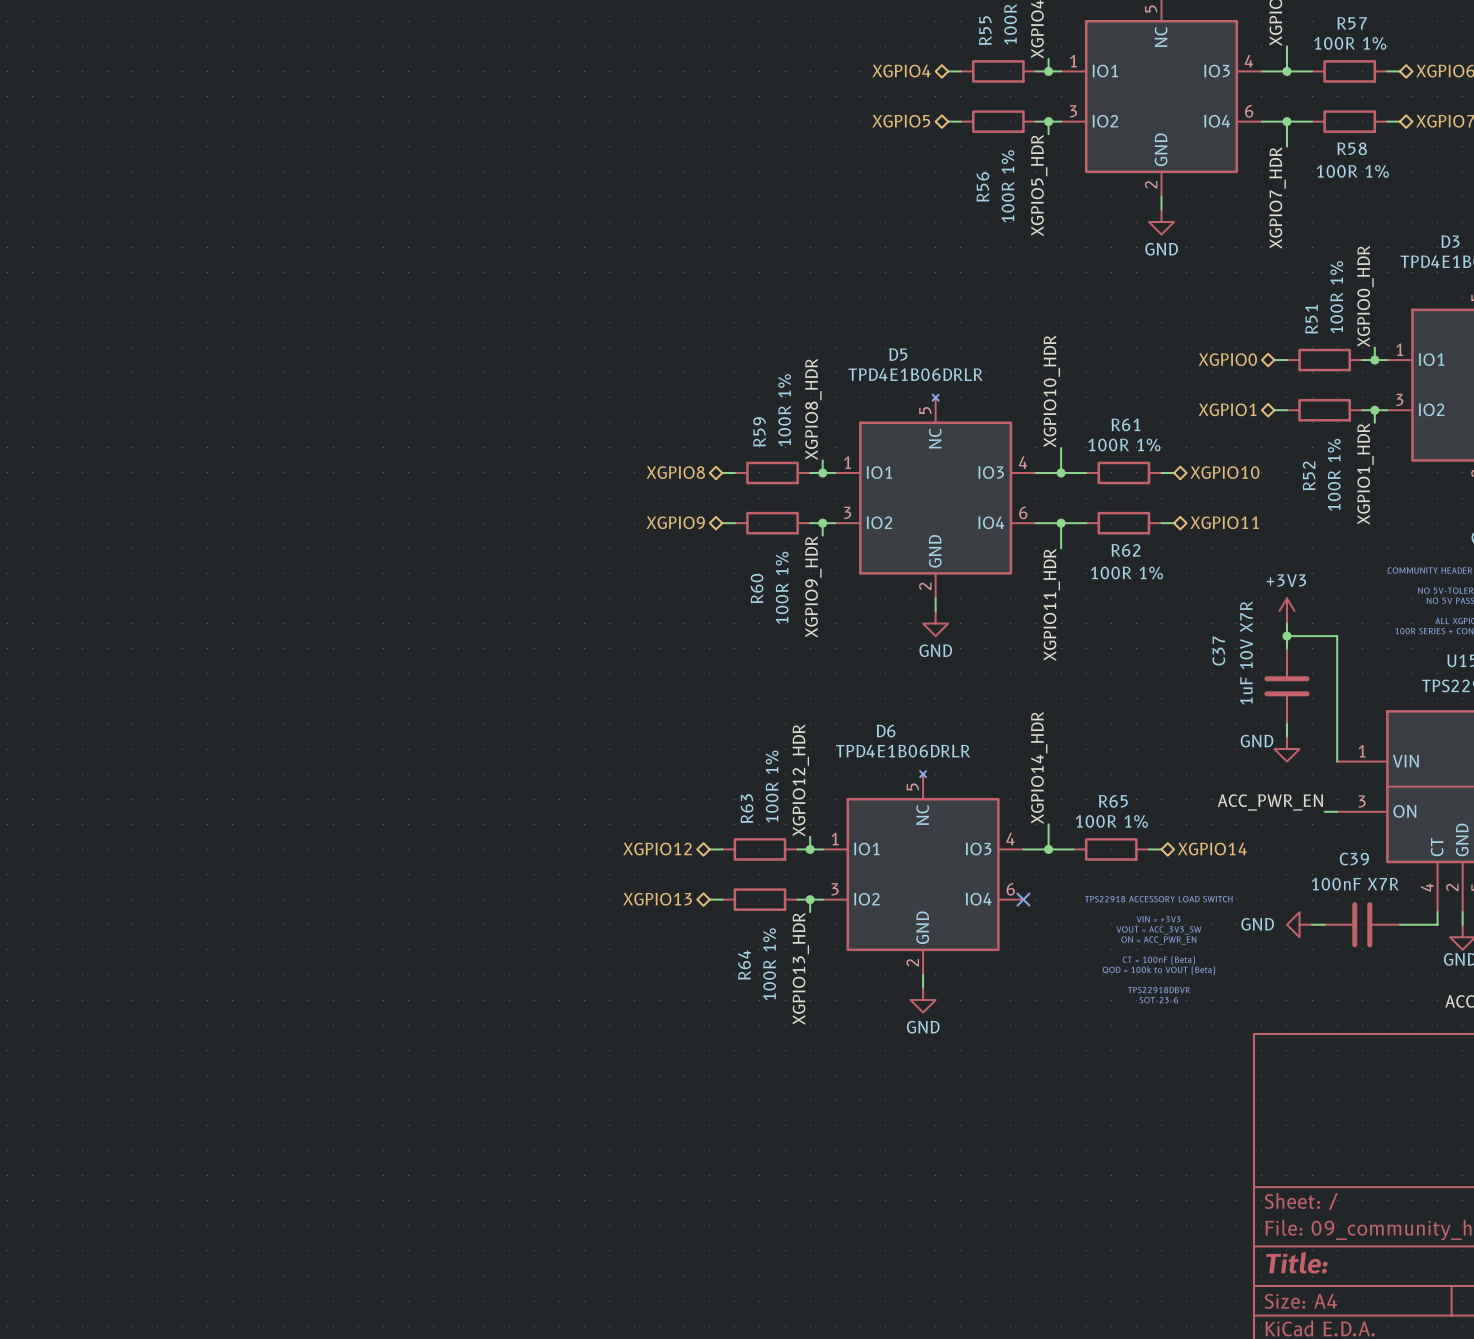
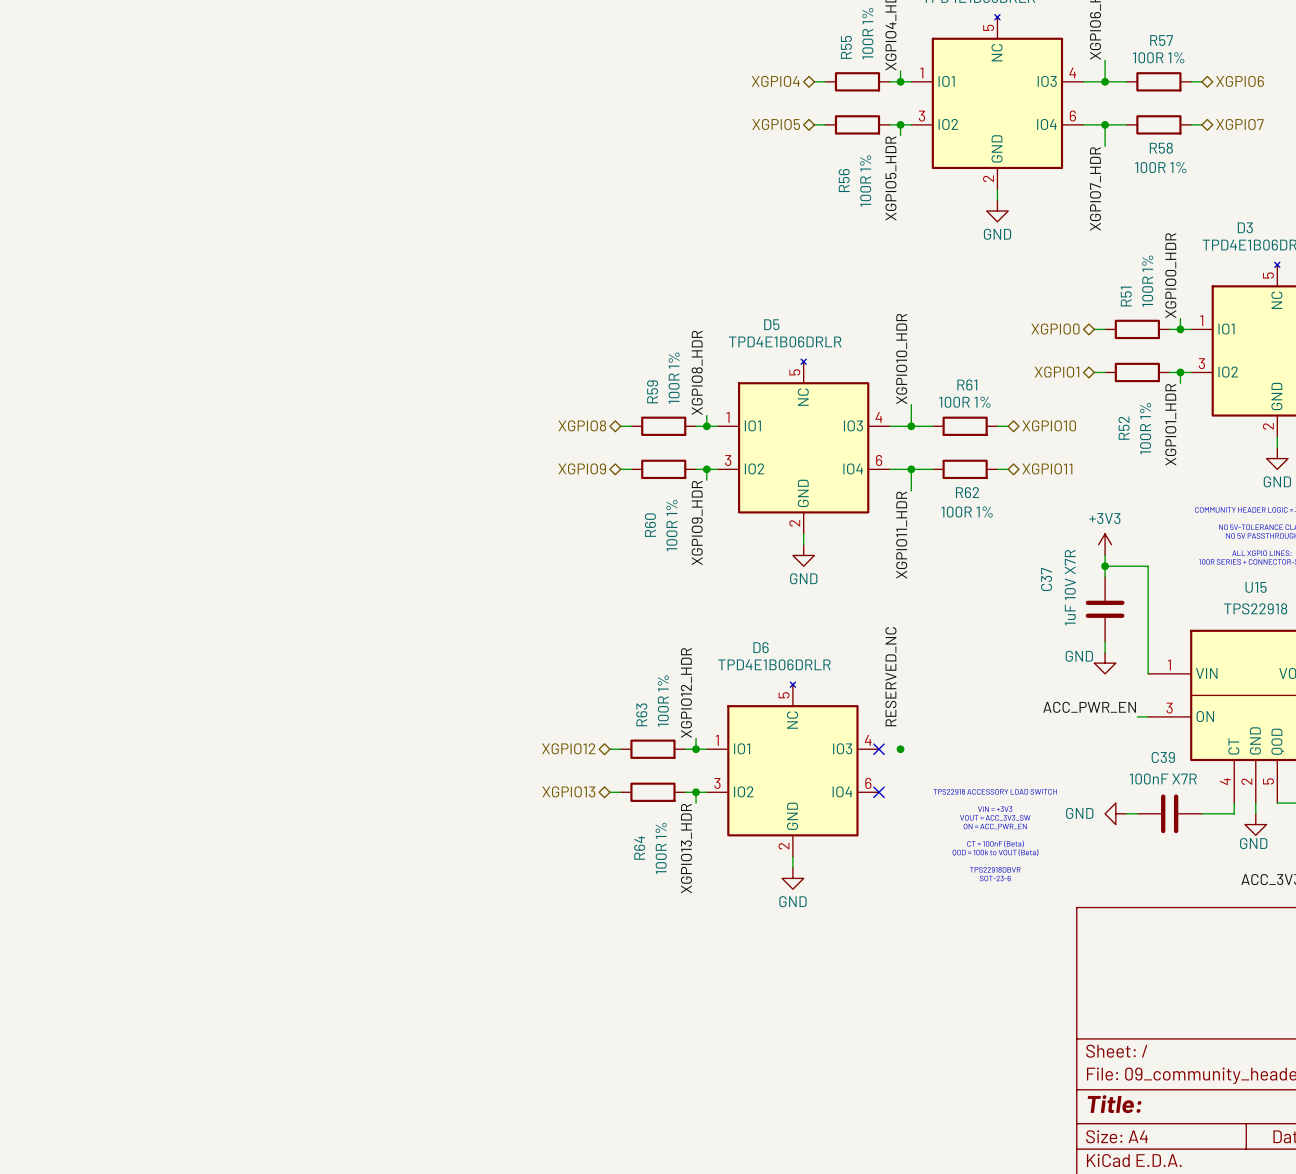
label: XGPIO14_HDR (1039, 767) -> RESERVED_NC (890, 676)
wire: (1048, 824) (1048, 849) -> none
wire: (1023, 849) (1073, 849) -> none
no-connect mark: none -> (879, 749)
R65: 100R 1% (1111, 849) -> none
wire: (1148, 849) (1161, 849) -> none
hierarchical label: XGPIO14 (1212, 849) -> none

